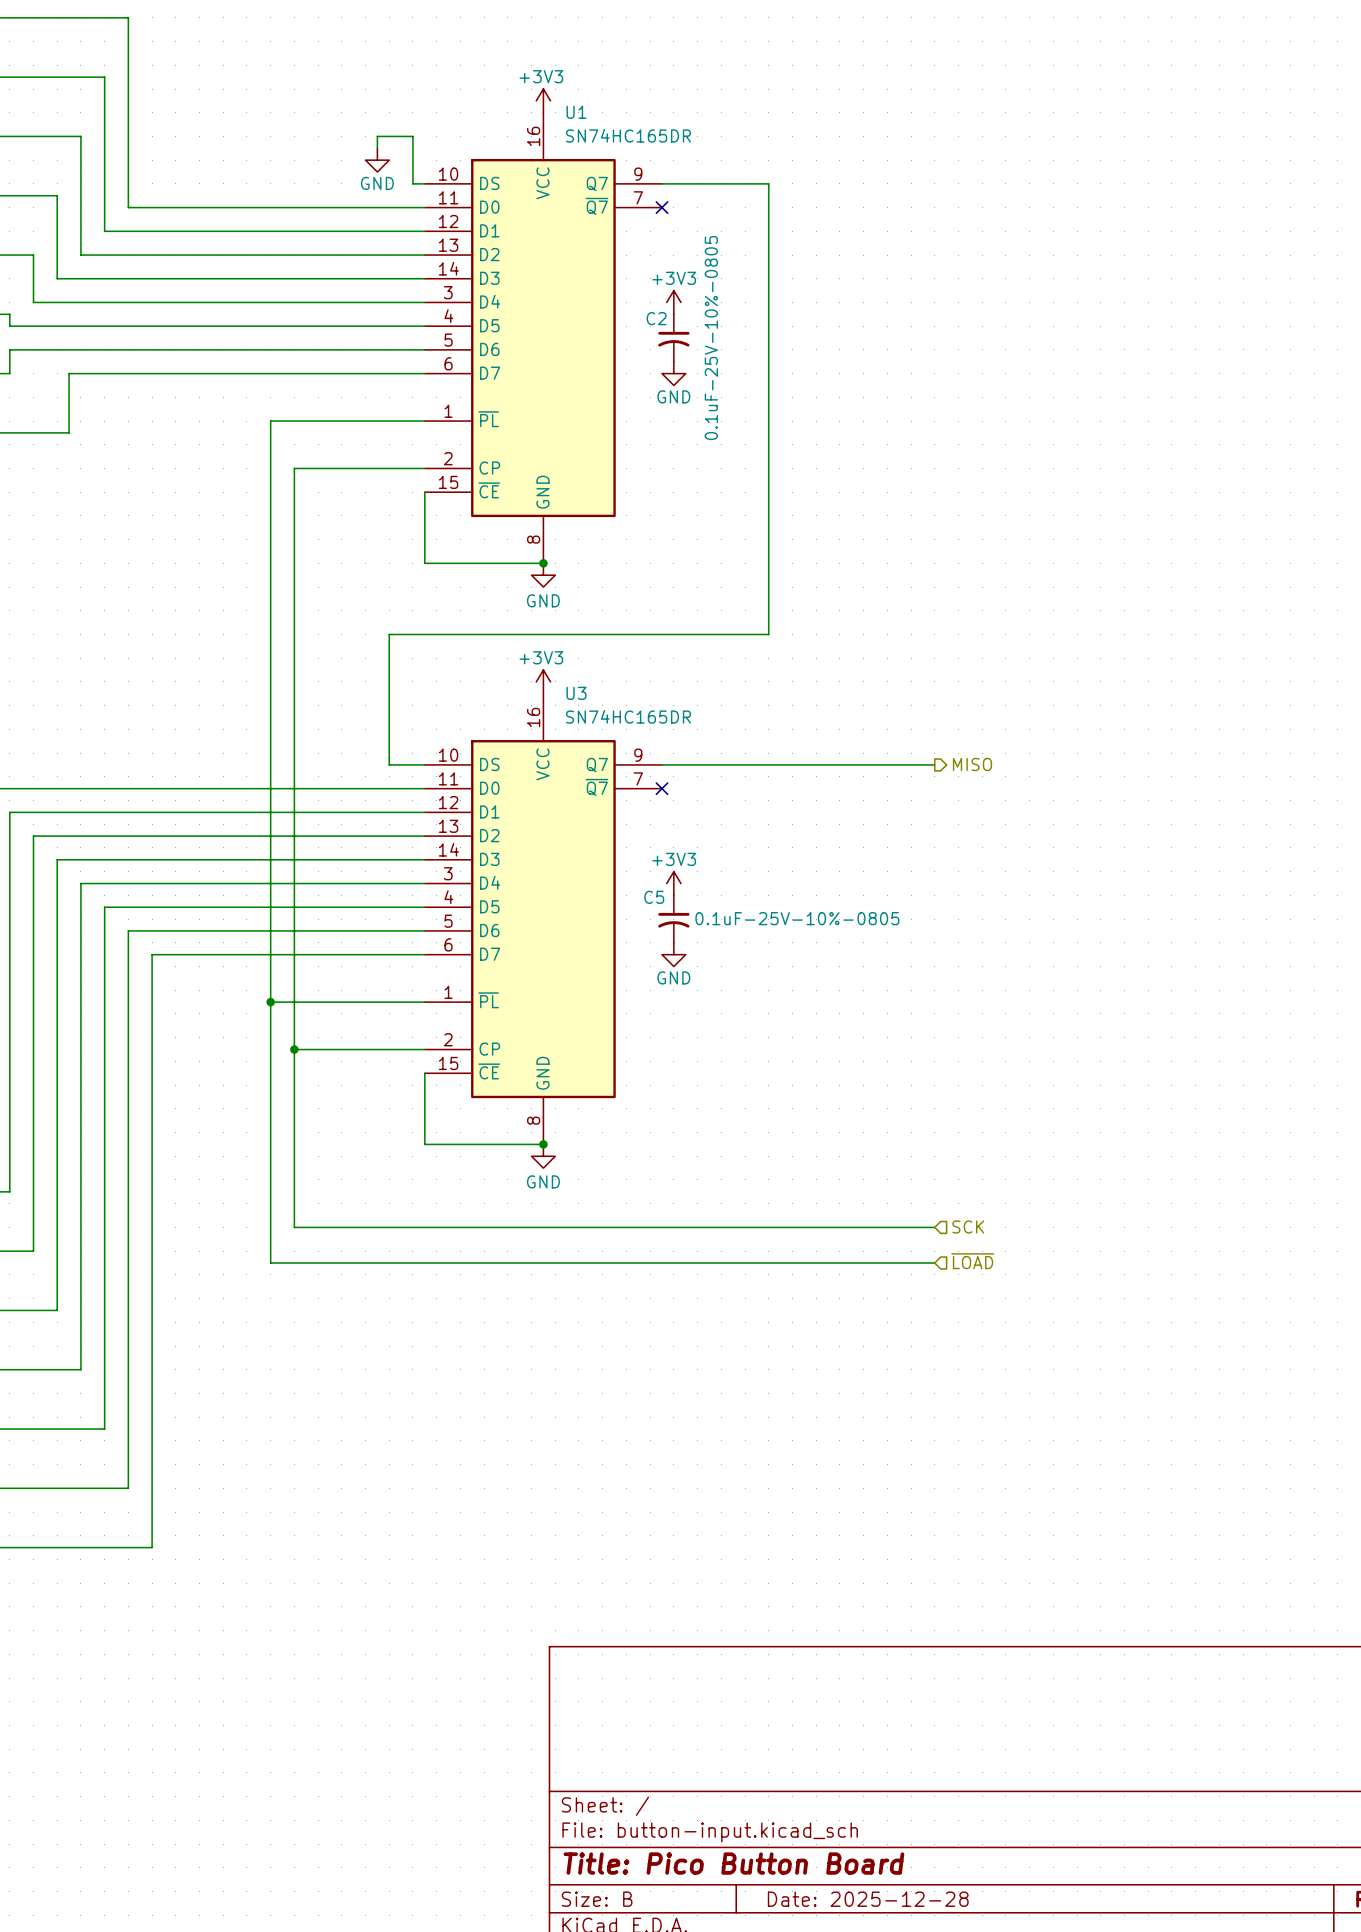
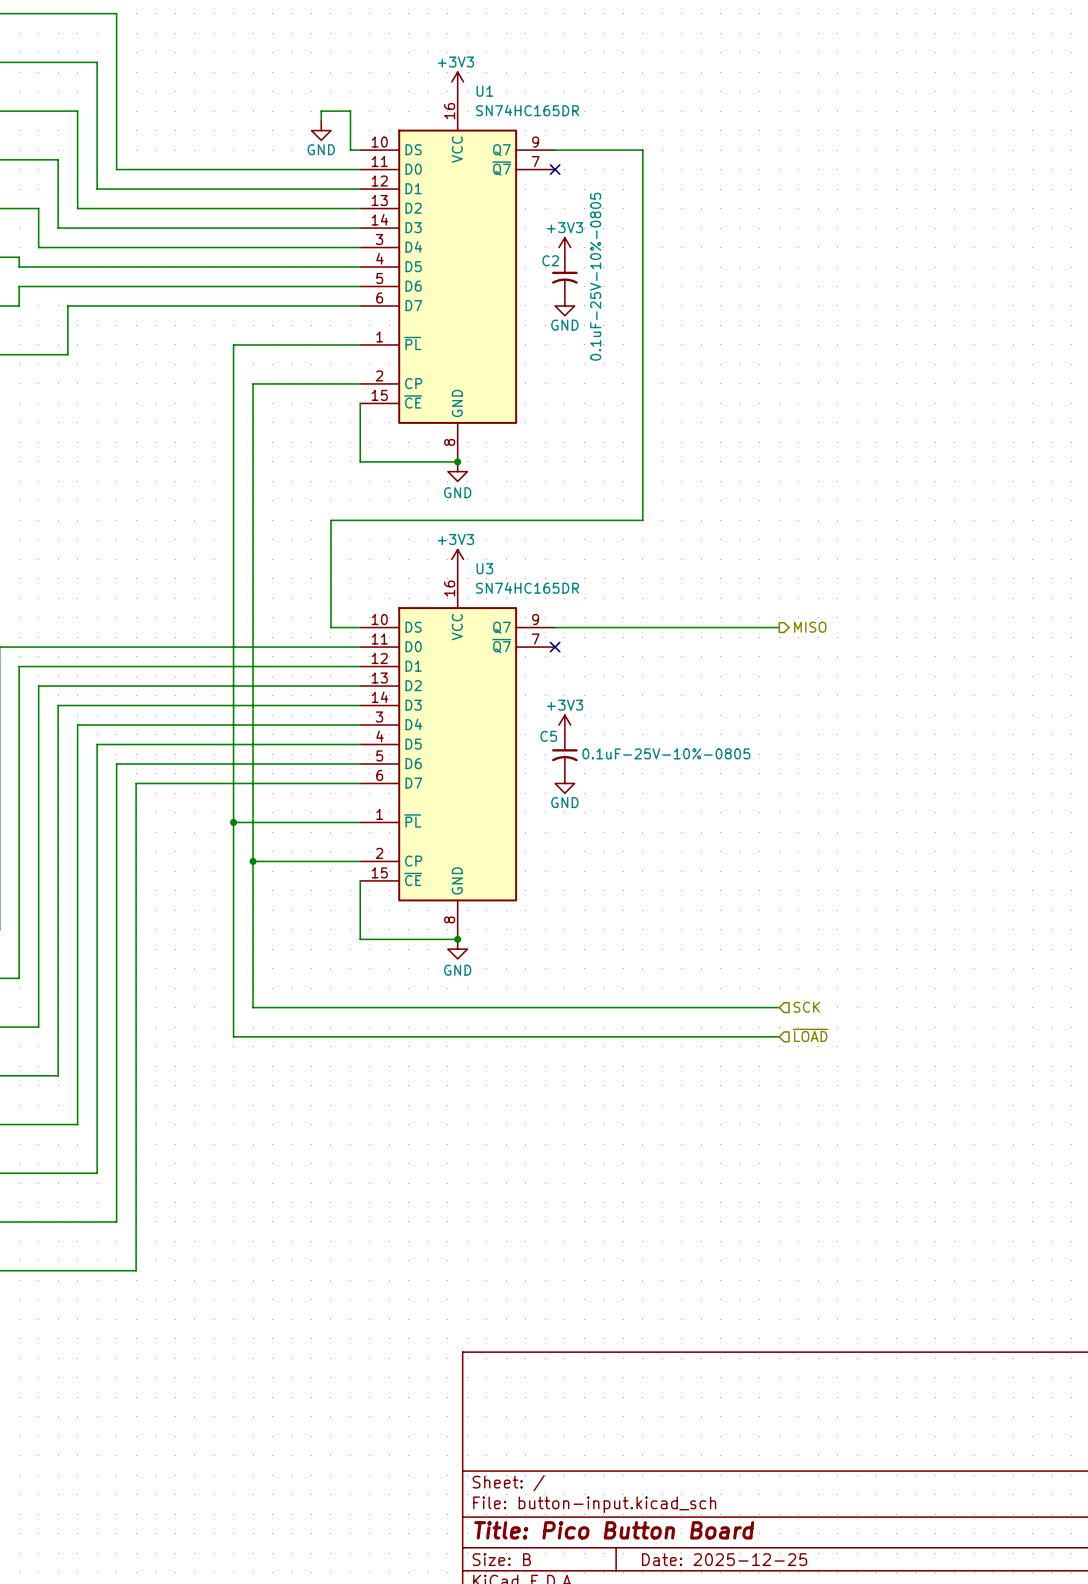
title block: Date: 2025-12-28 (868, 1899) -> Date: 2025-12-25 (724, 1559)

